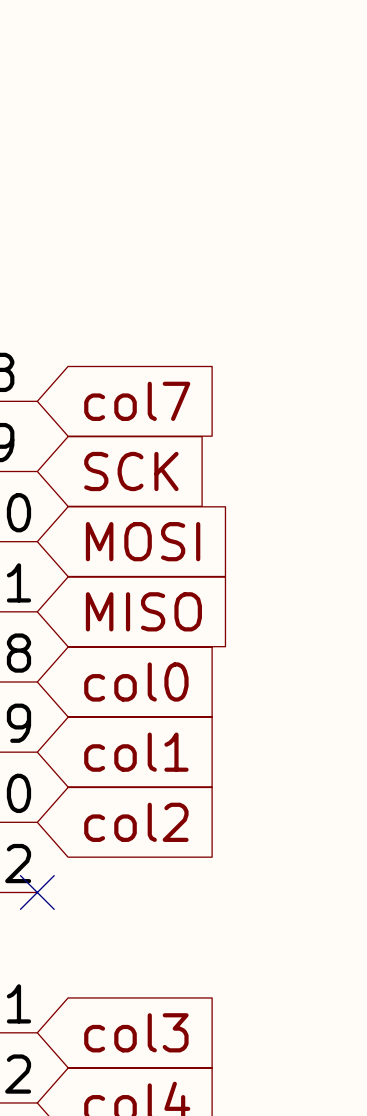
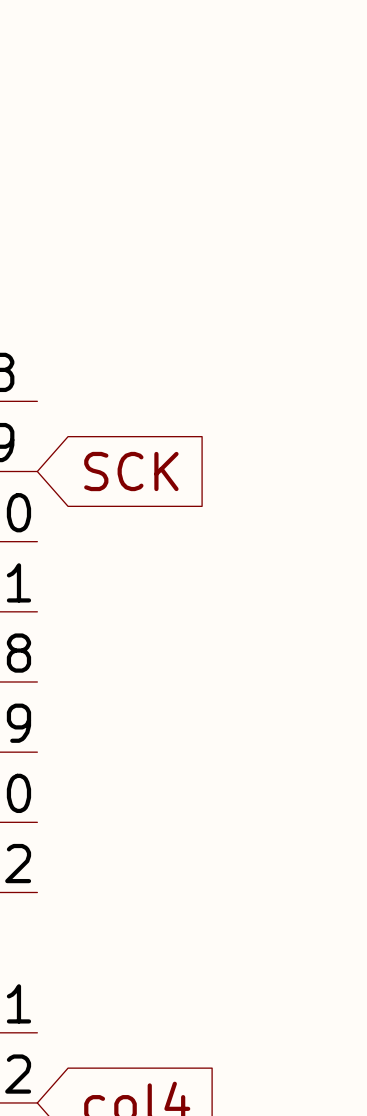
global label: col7 (137, 401) -> none
global label: MOSI (143, 541) -> none
global label: MISO (143, 611) -> none
global label: col0 (136, 681) -> none
global label: col1 (136, 752) -> none
global label: col2 (136, 822) -> none
no-connect mark: (37, 892) -> none
global label: col3 (136, 1032) -> none

